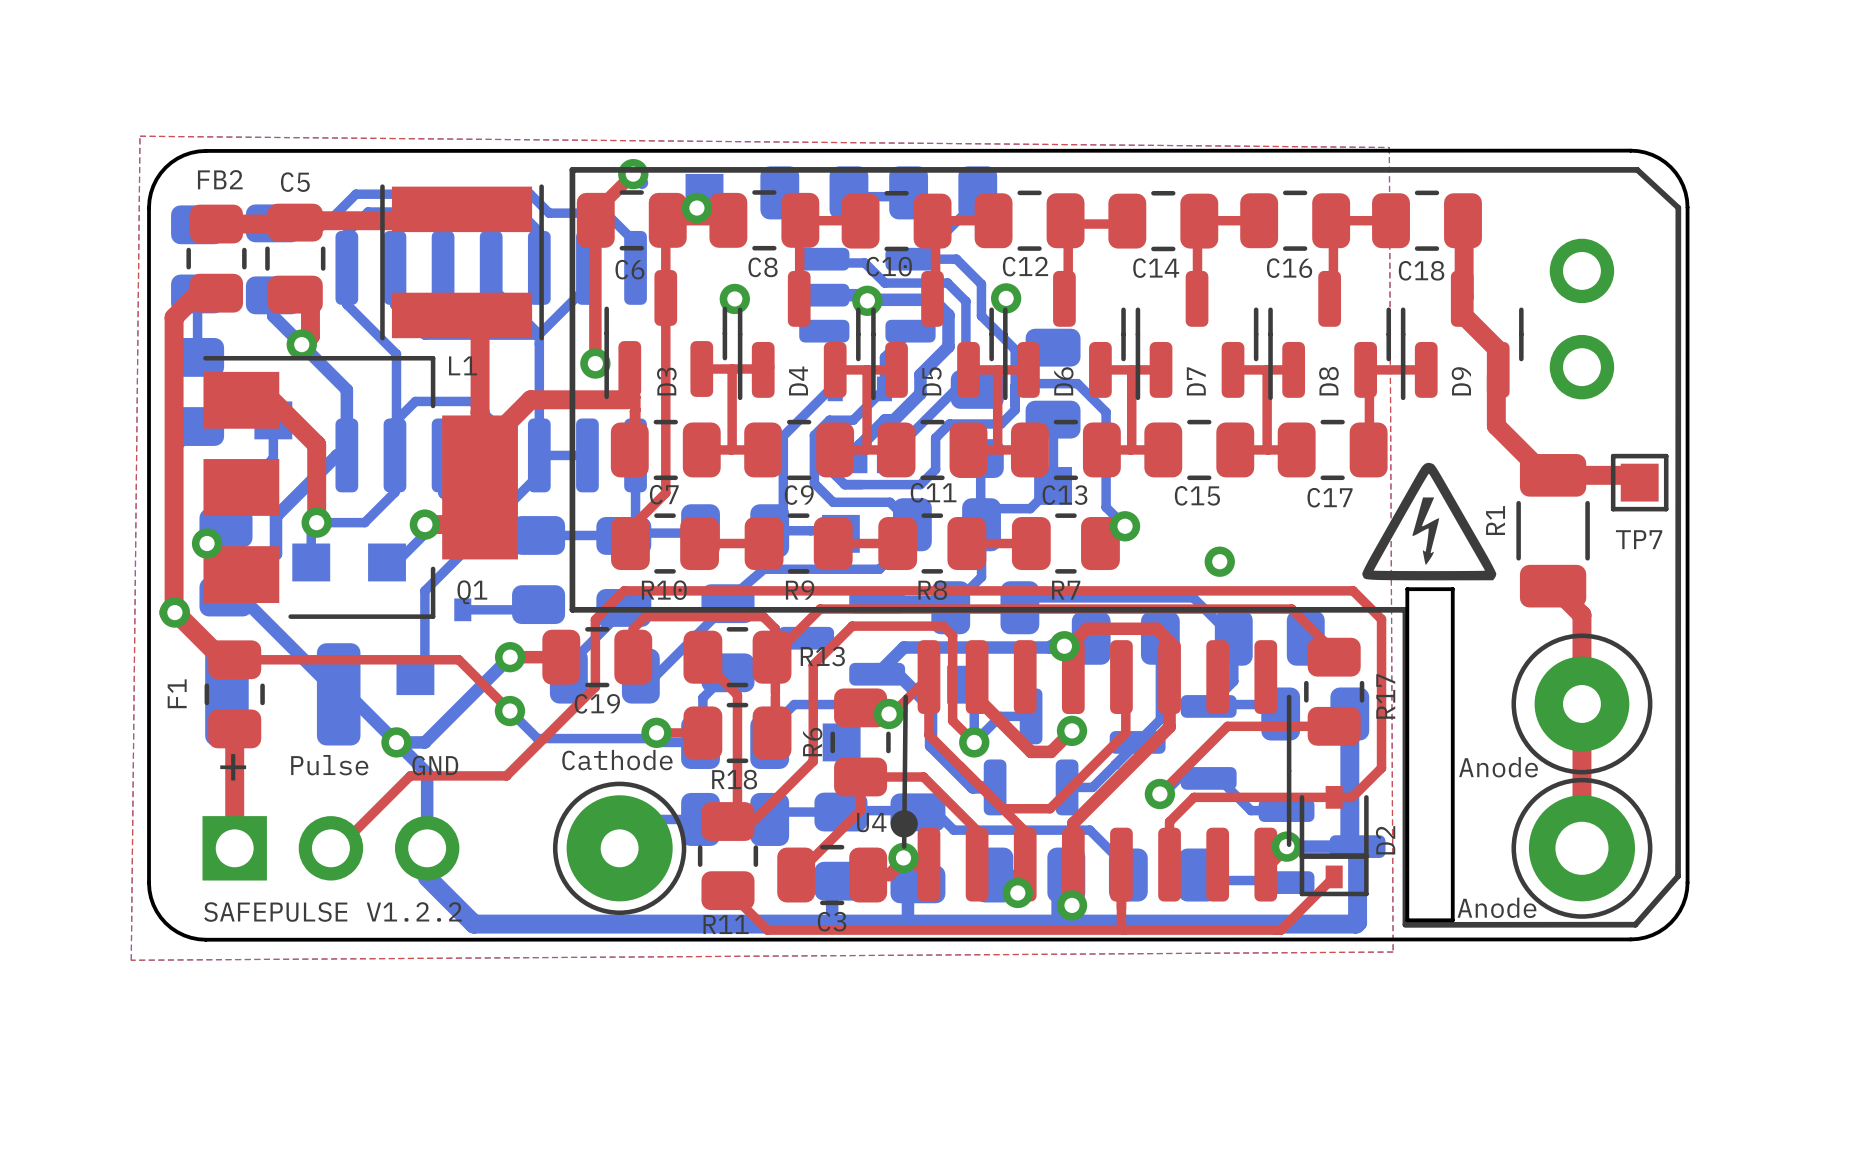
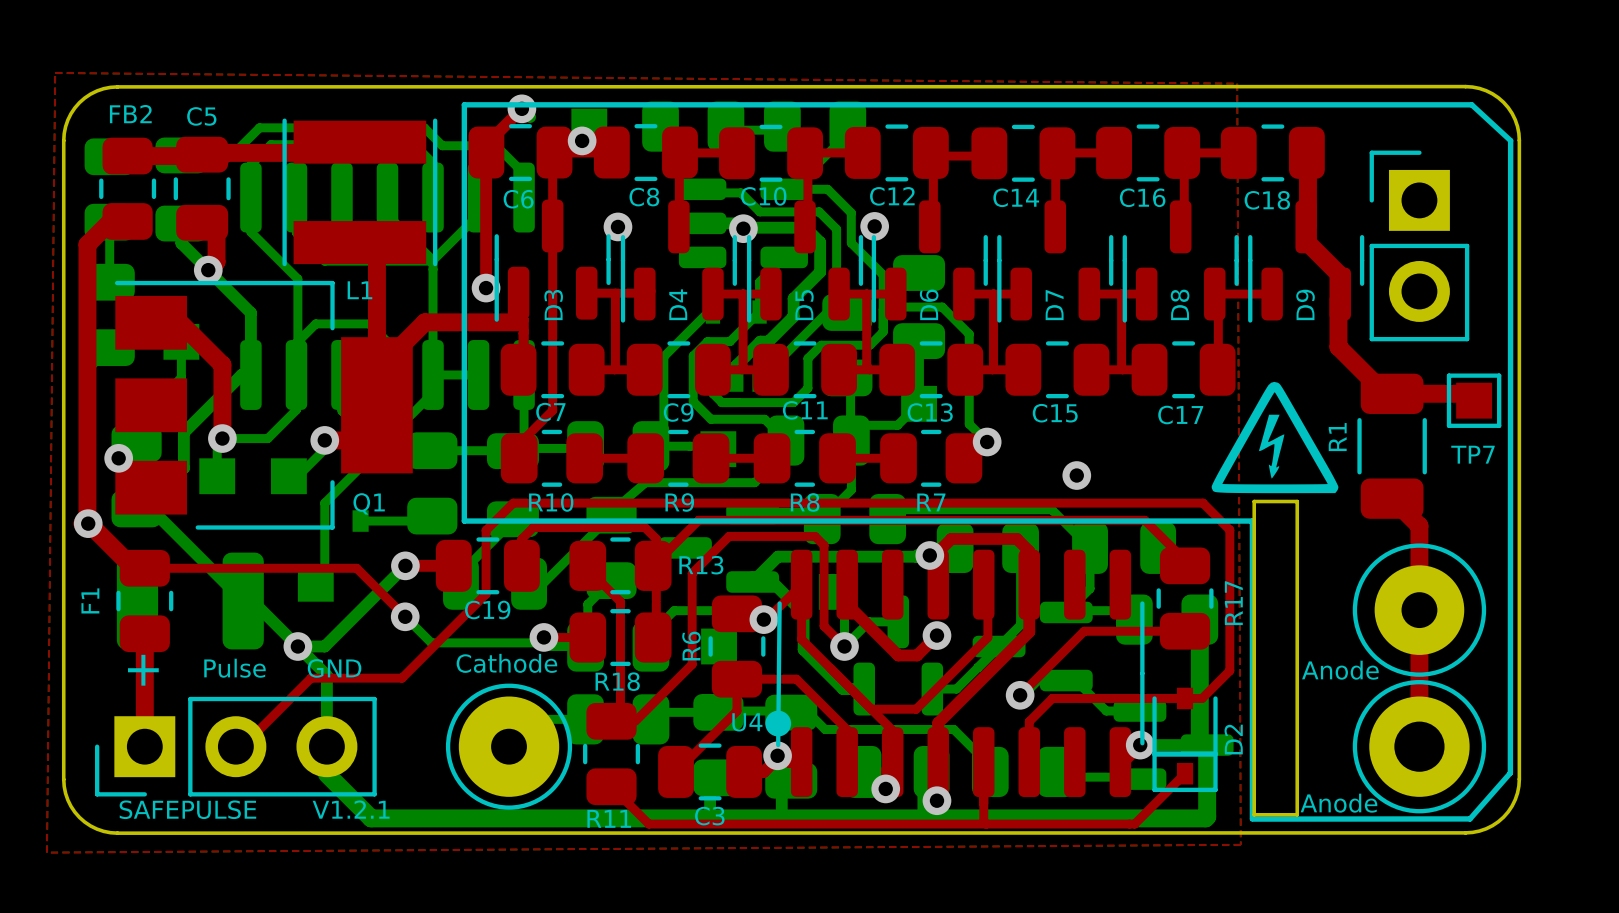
part footprint: [1549, 238, 1615, 400] -> [1369, 150, 1470, 342]
part footprint: [202, 816, 460, 881] -> [95, 696, 377, 797]
text: SAFEPULSE V1.2.2 (332, 912) -> SAFEPULSE V1.2.1 (254, 809)

